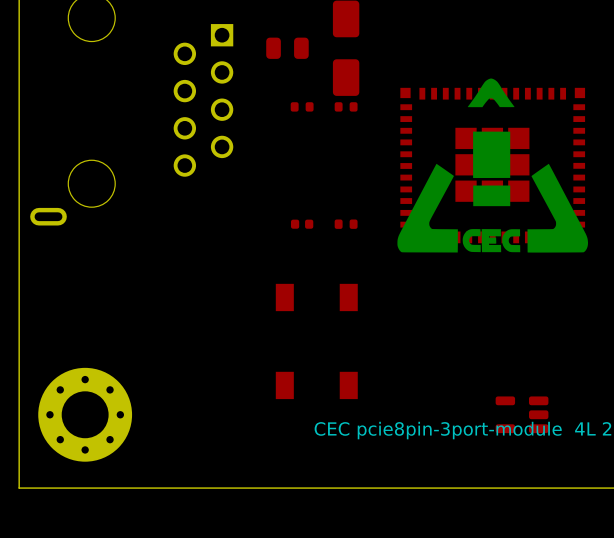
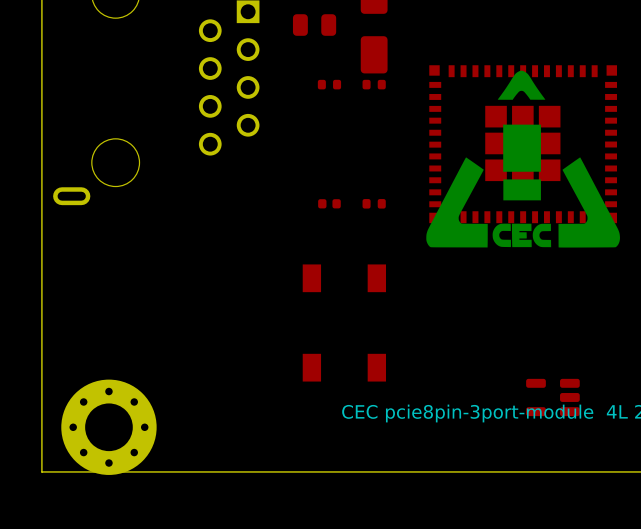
drawing position: (492, 165) -> (523, 159)
part position: (85, 414) -> (108, 427)

